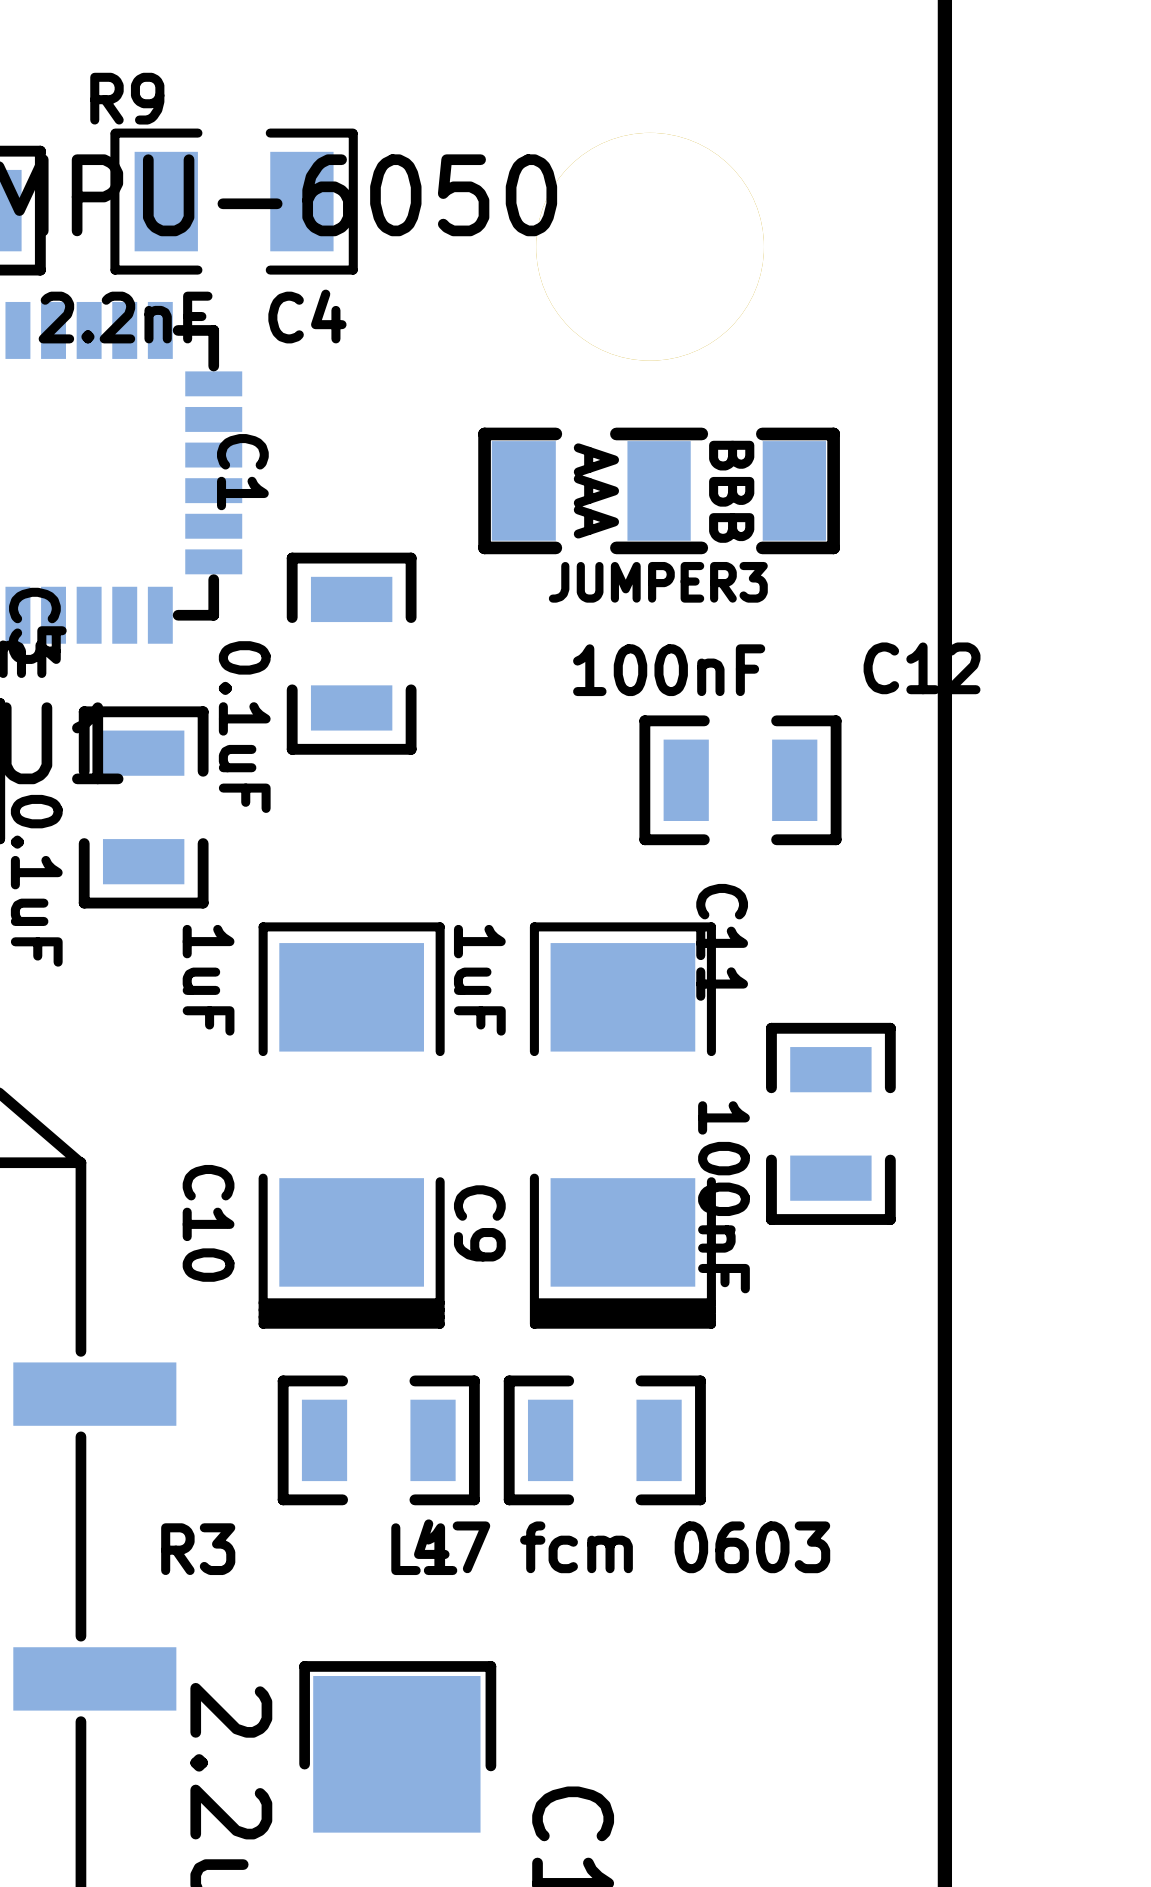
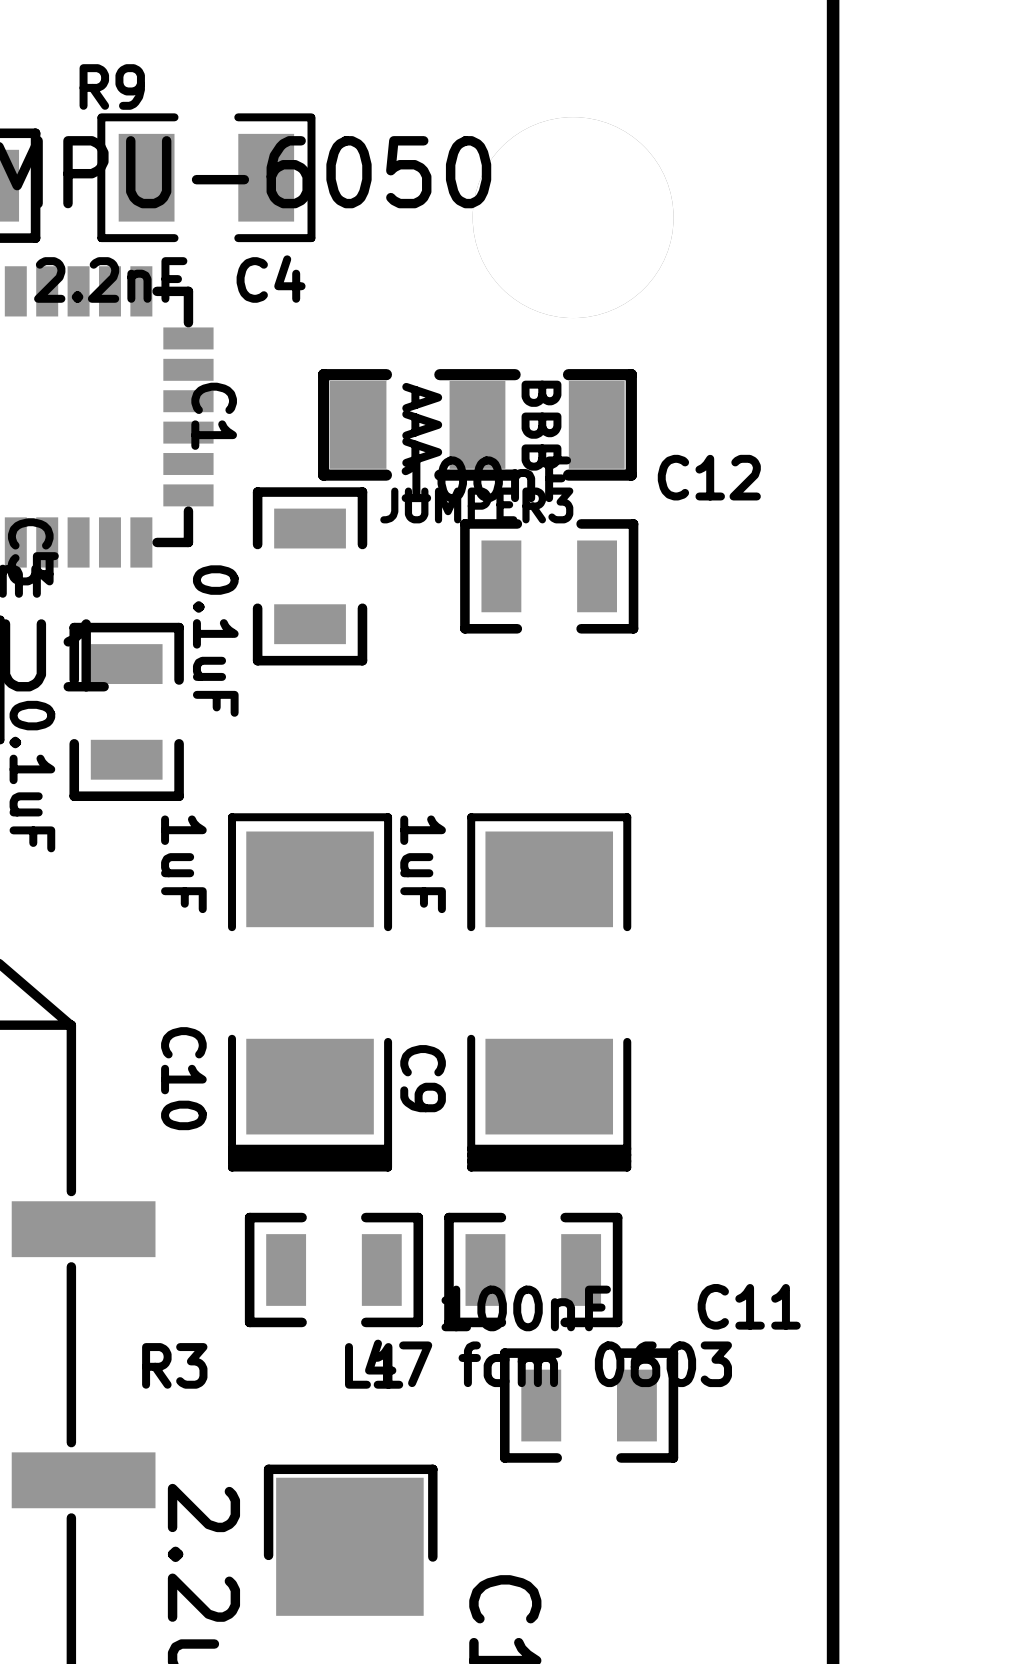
part position: (659, 490) -> (477, 424)
C12 position: (740, 780) -> (549, 576)
C11 rotation: 0° (830, 1123) -> 90° clockwise (589, 1405)
C11 position: (830, 1123) -> (589, 1405)

